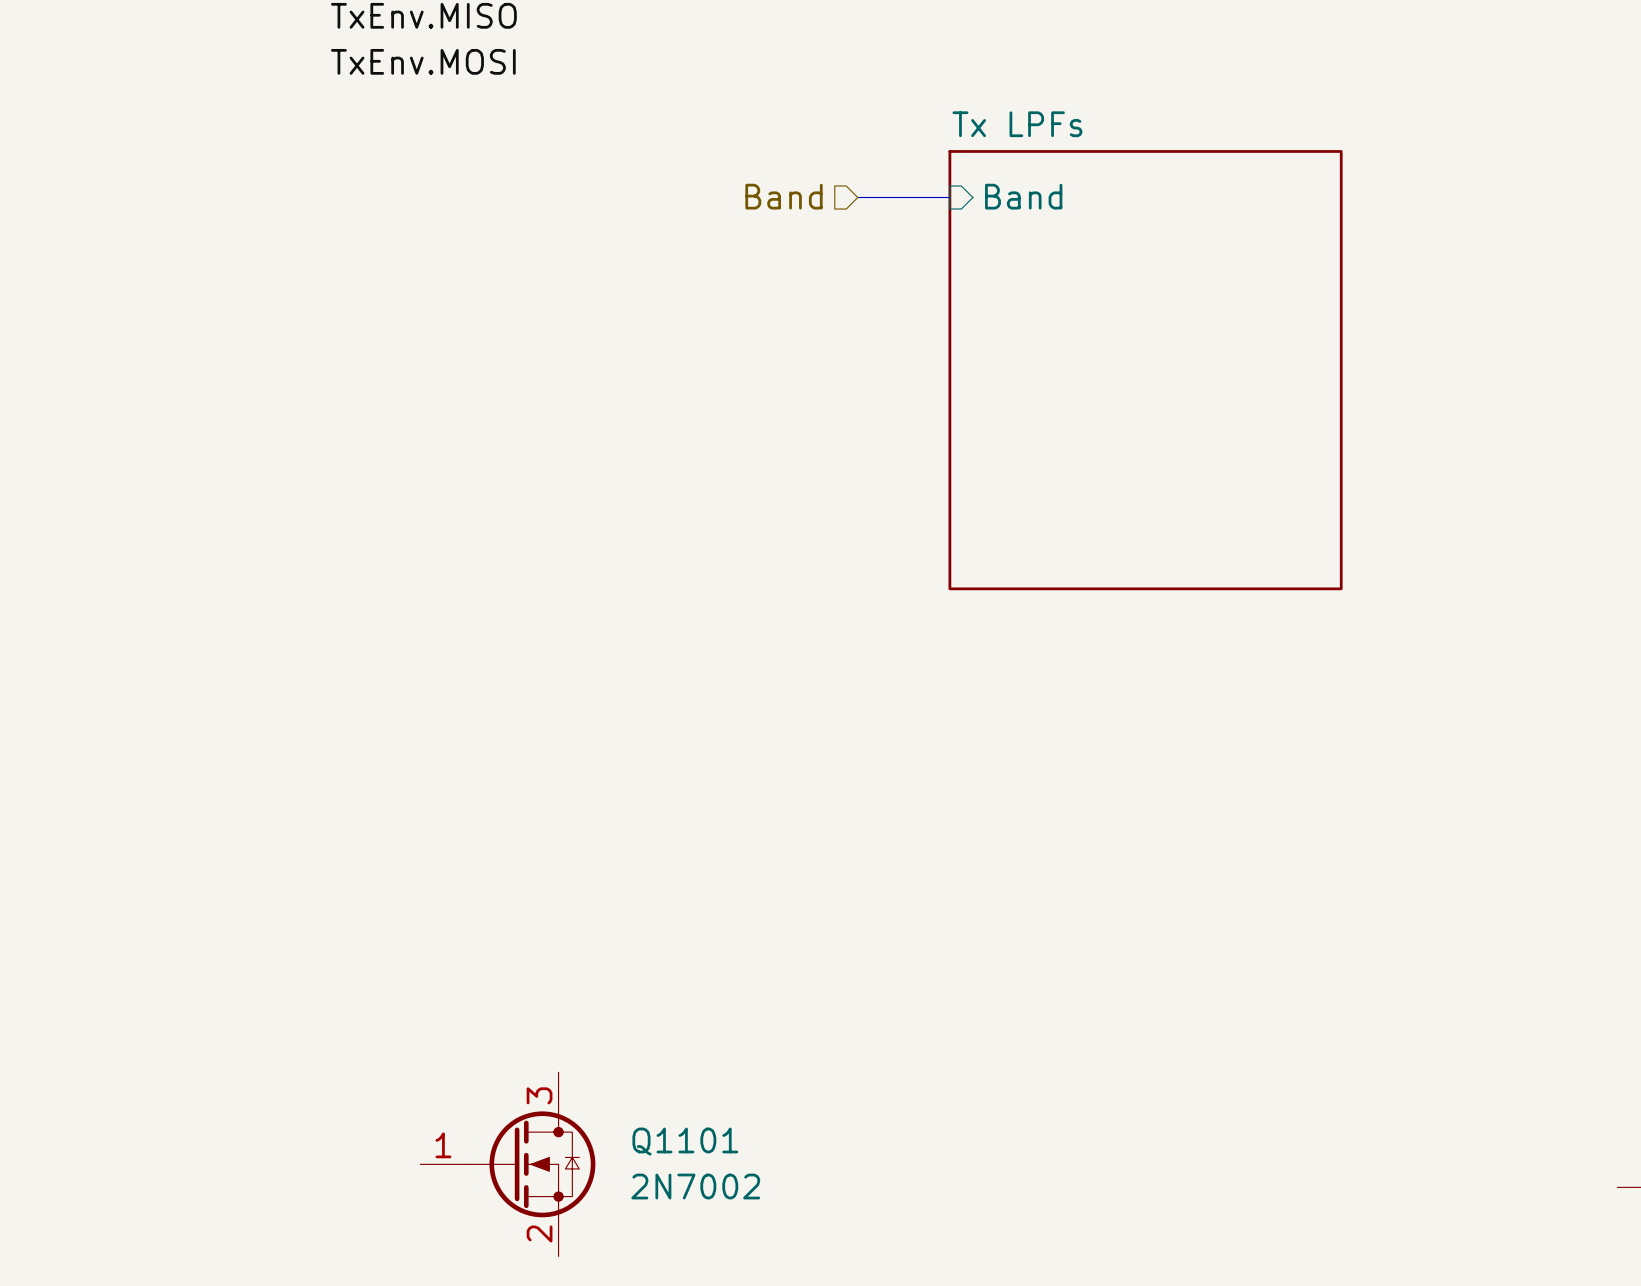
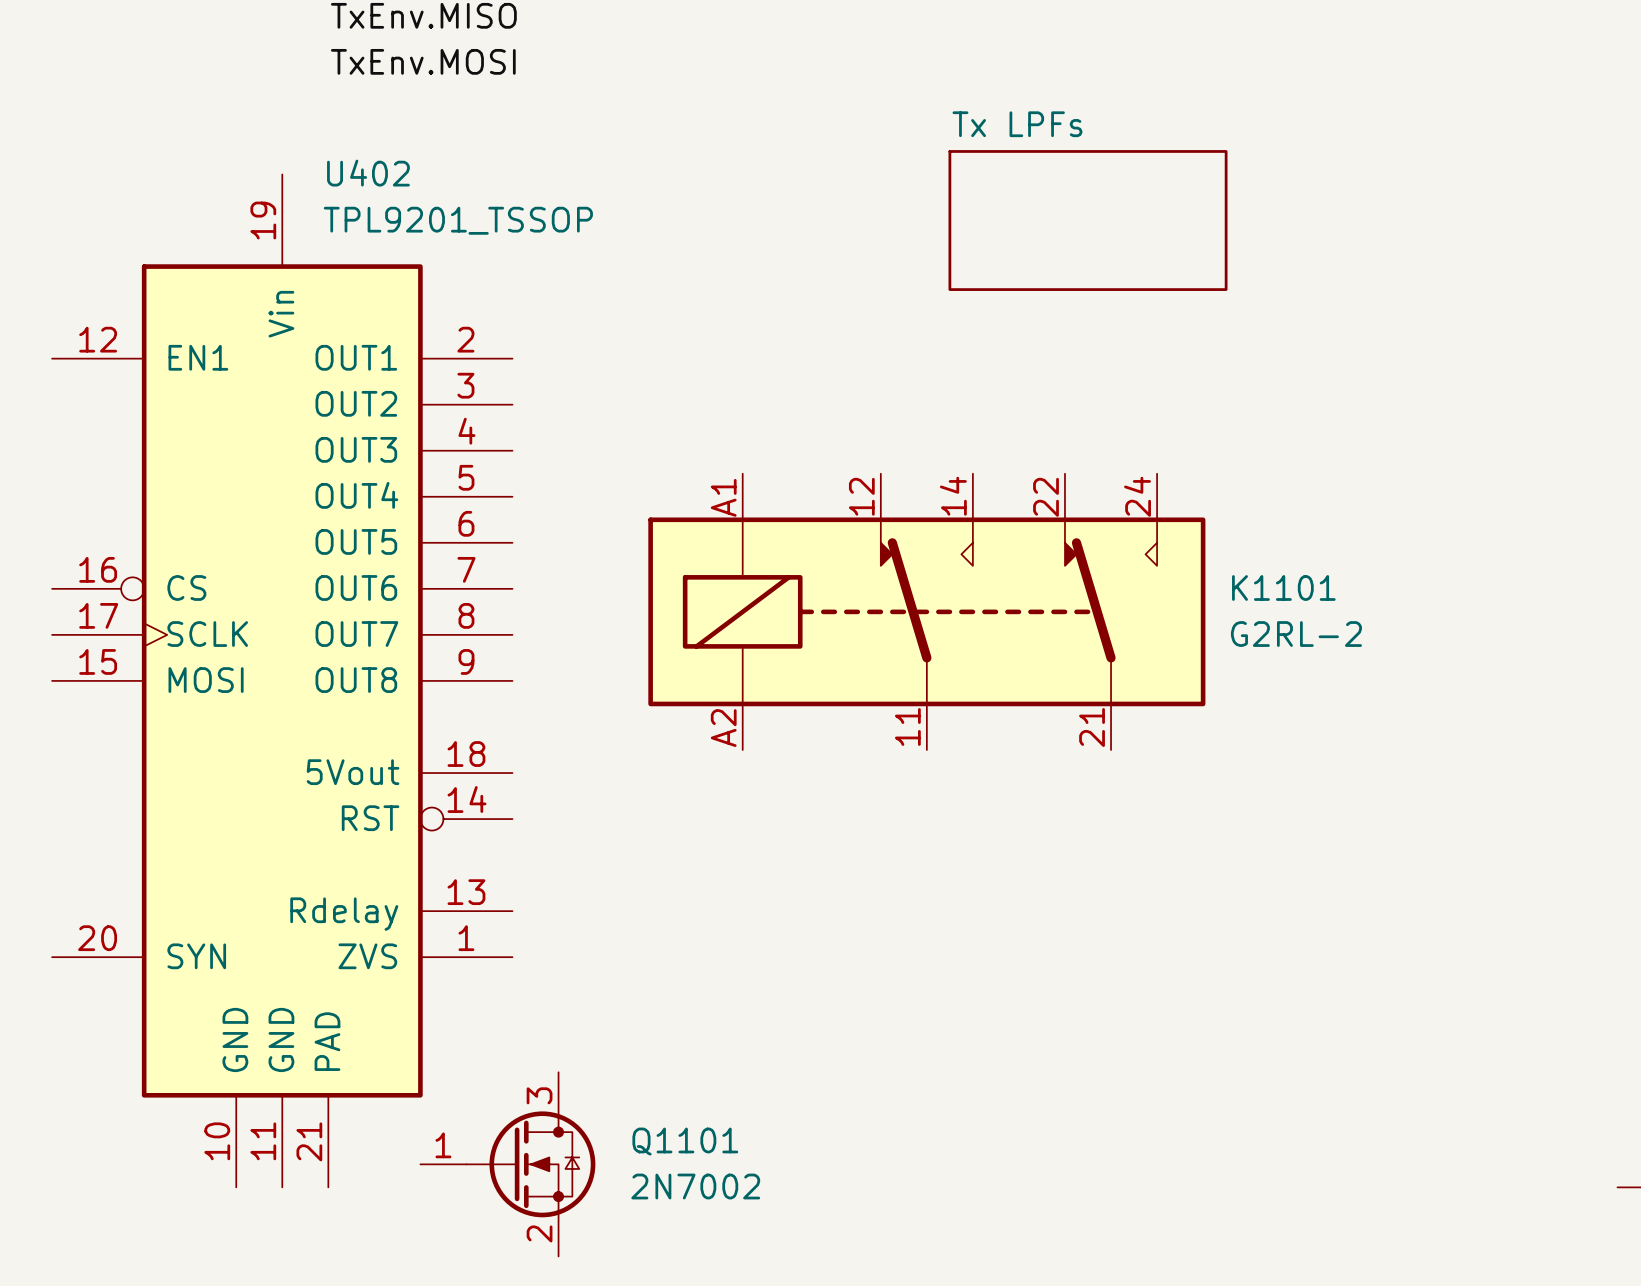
hierarchical label: Band (784, 196) -> none
sheet pin: Band (1023, 196) -> none
bus: (857, 197) (949, 197) -> none
sheet Tx LPFs: none -> (1088, 220)
sheet Tx LPFs: (1145, 370) -> none
K1101: none -> G2RL-2 (926, 611)
U402: none -> TPL9201_TSSOP (282, 680)

